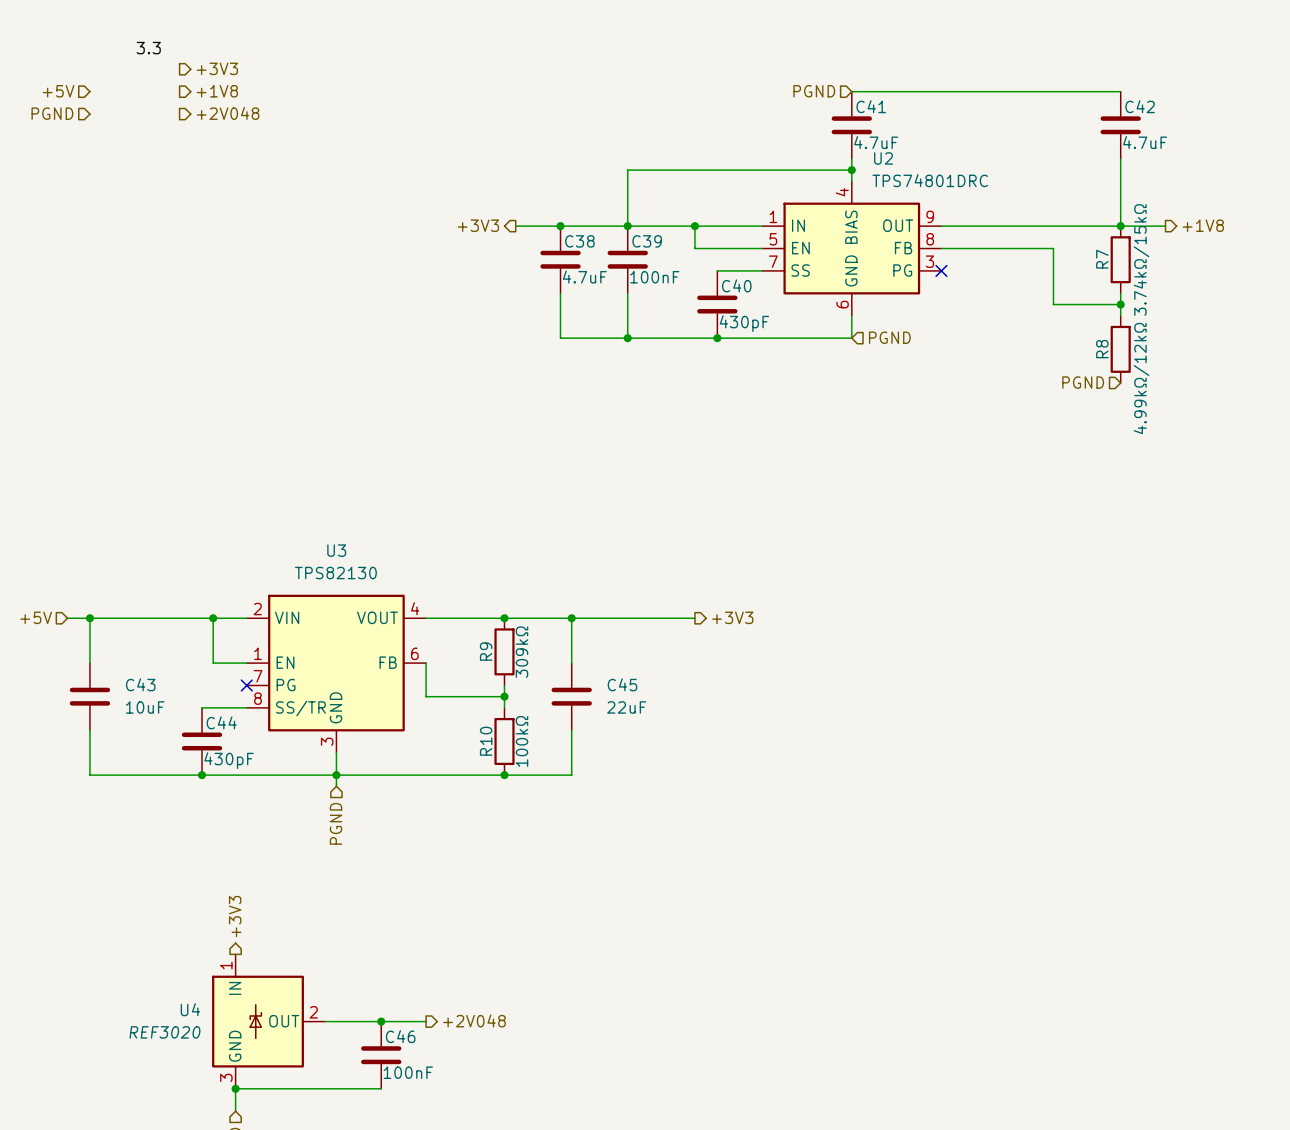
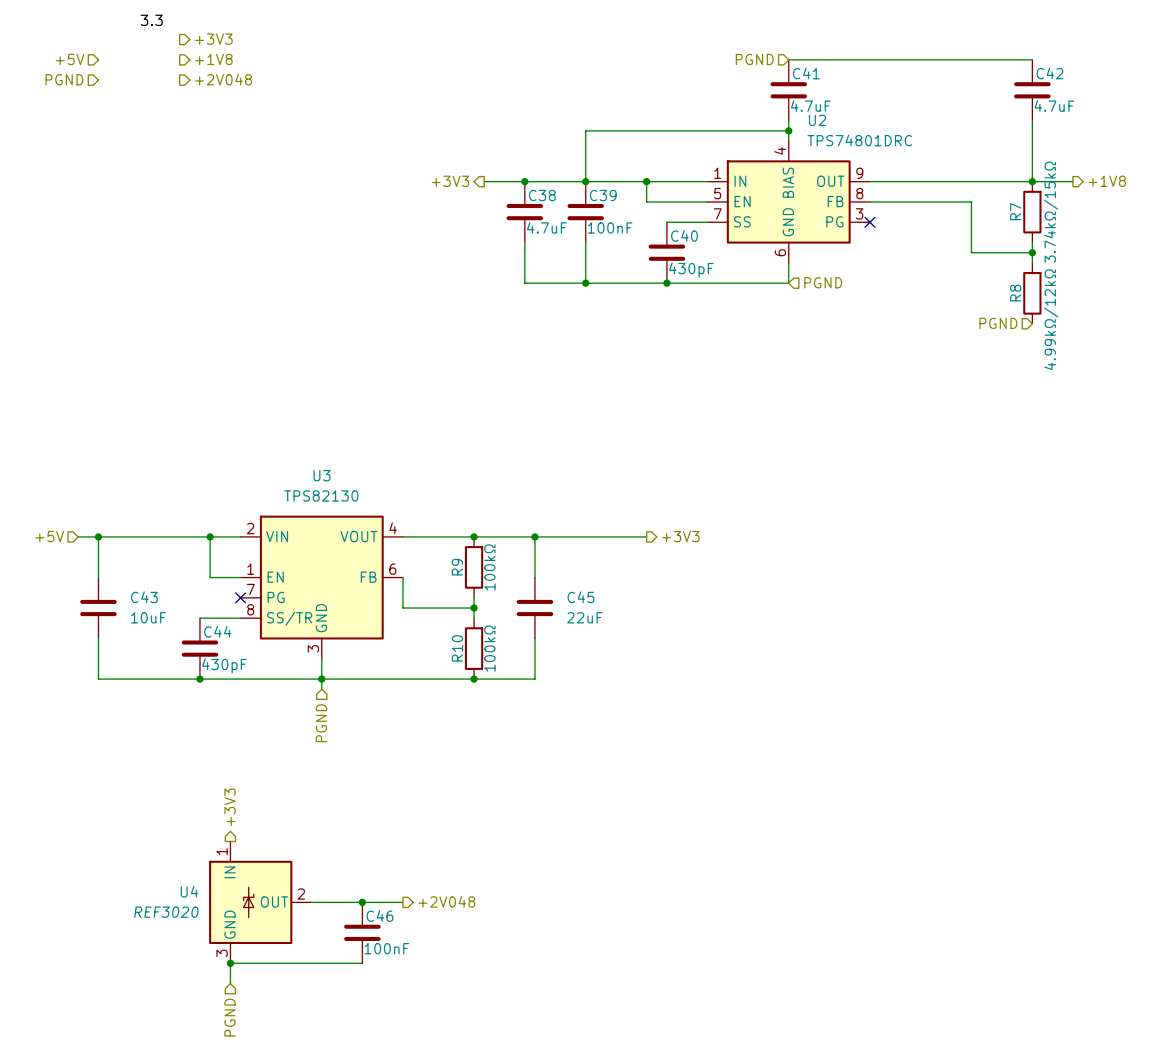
R9 value: 309kΩ (522, 652) -> 100kΩ (489, 567)

